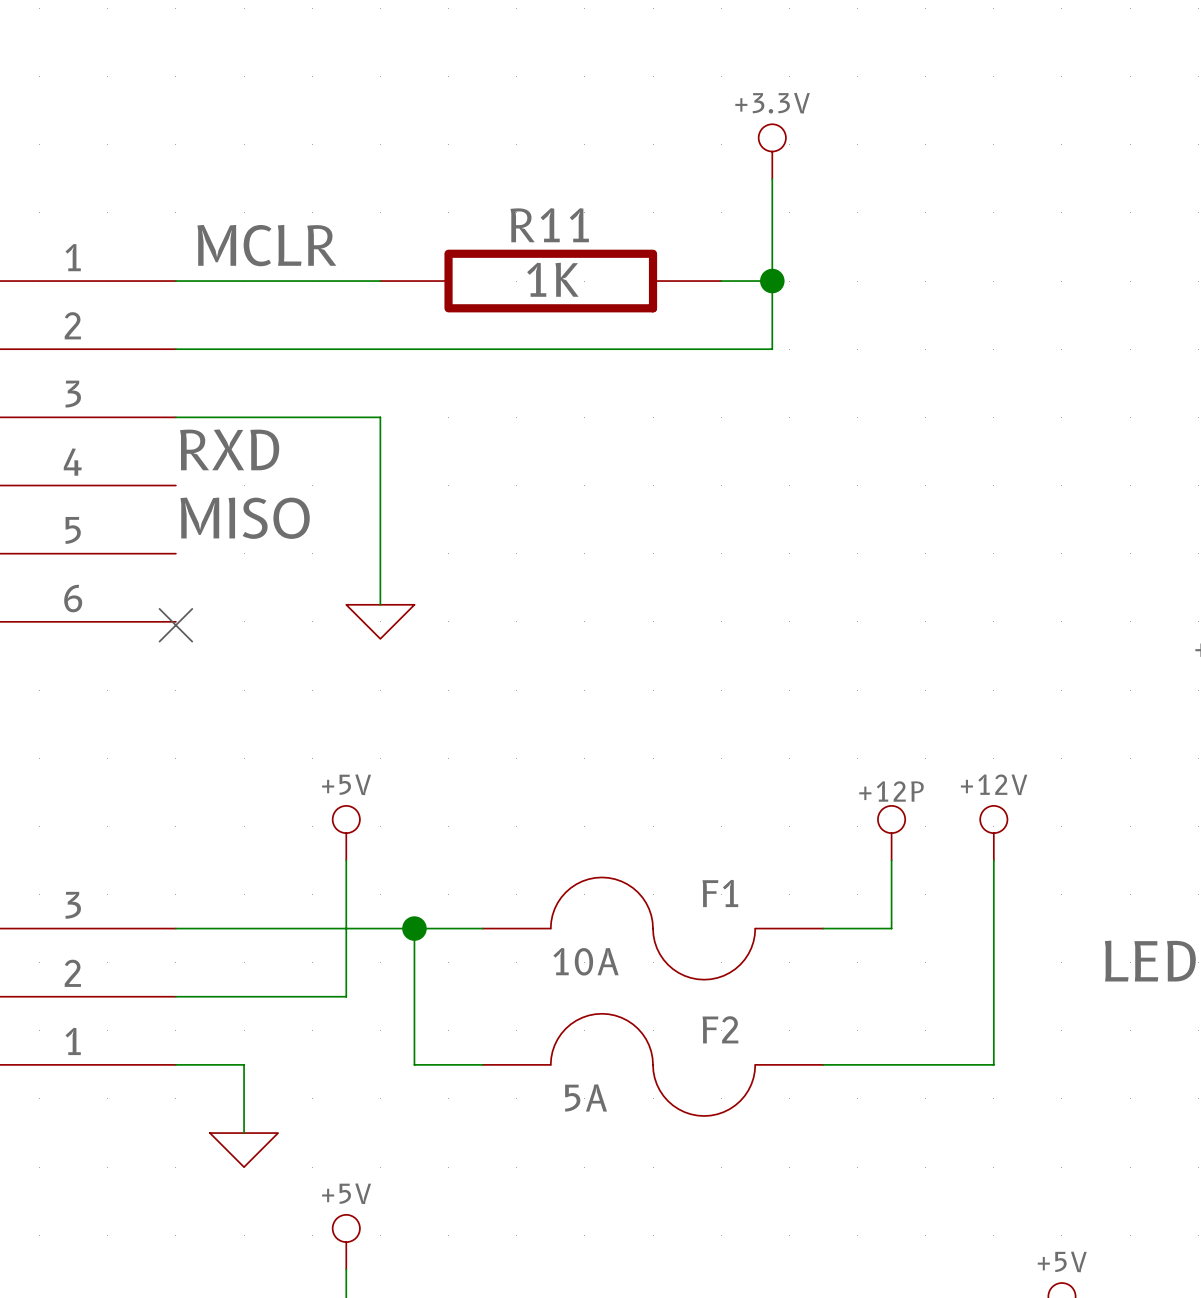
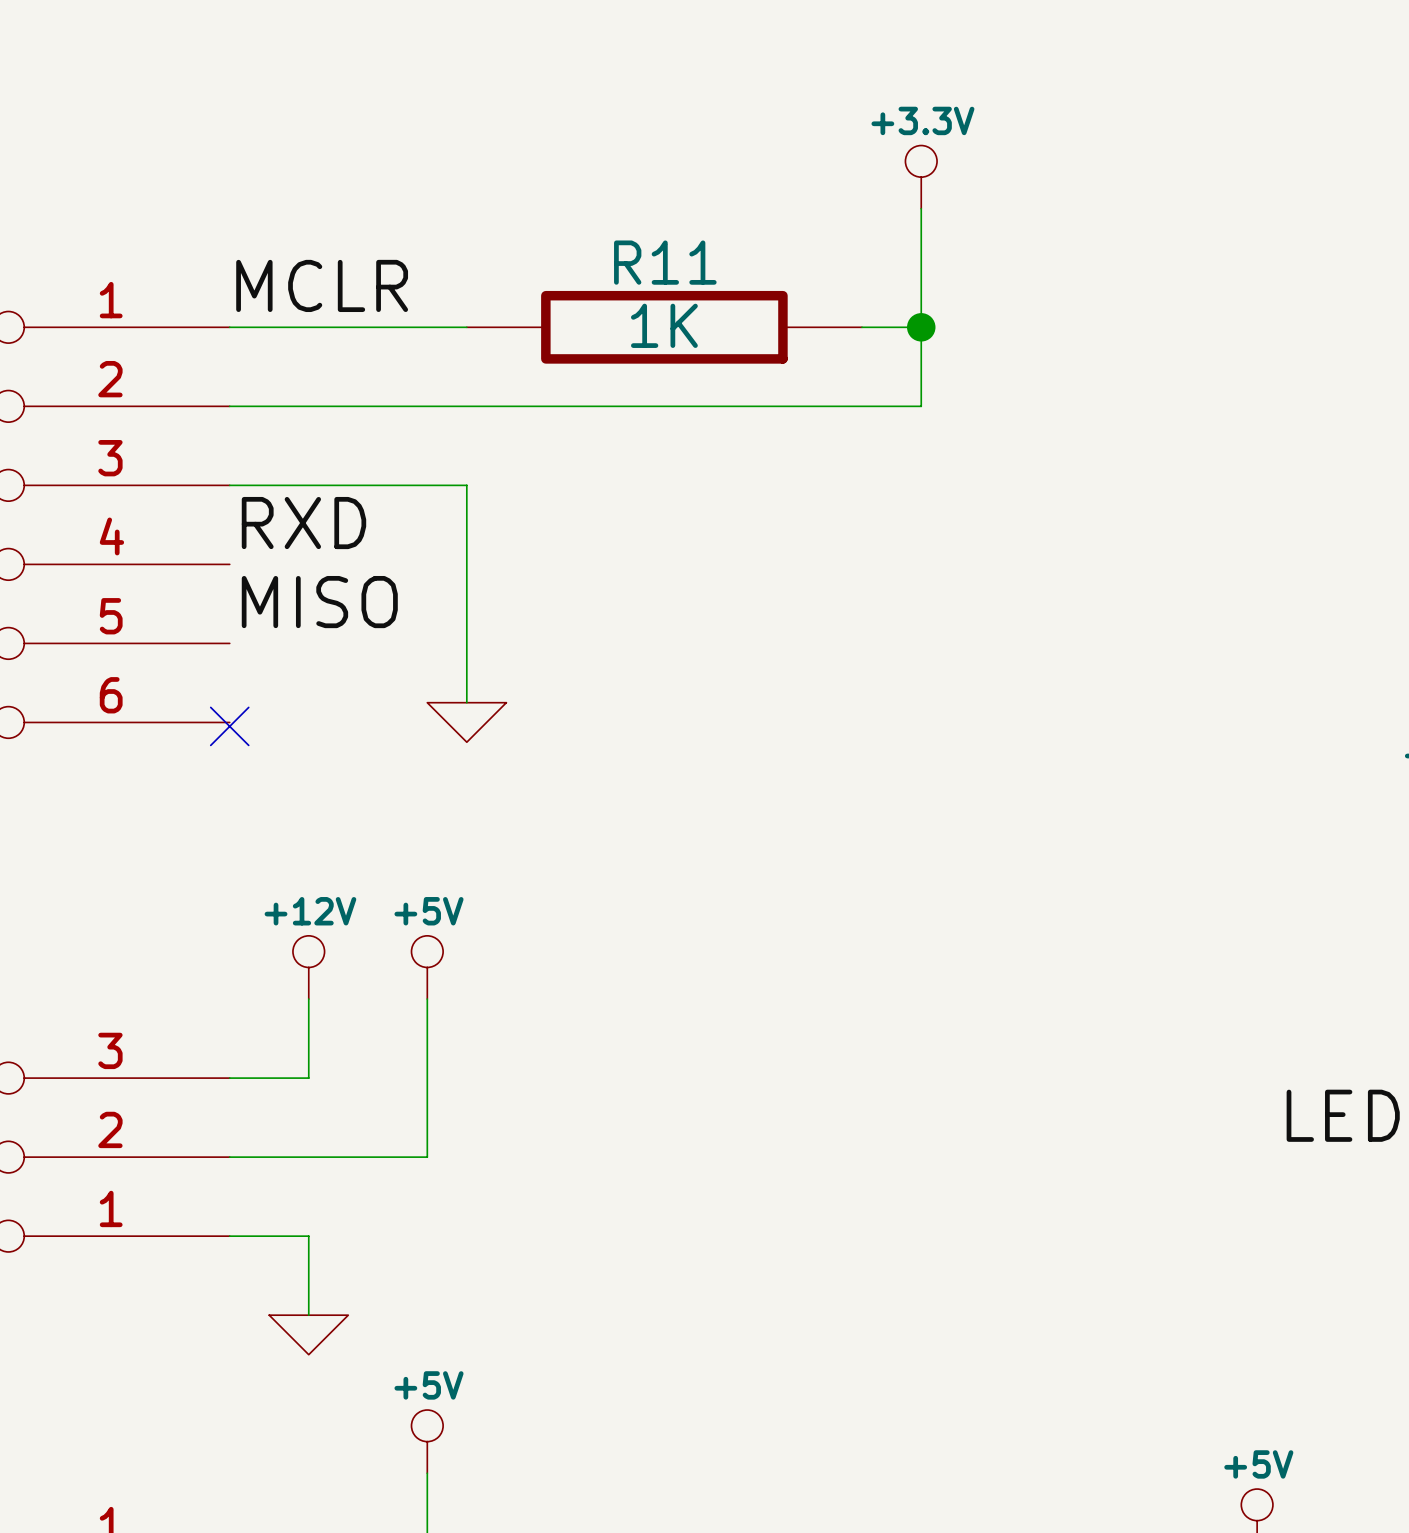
power symbol: none -> +12V (308, 967)
power symbol: +12P (891, 833) -> none
power symbol: +12V (993, 833) -> none
wire: (891, 860) (891, 928) (823, 928) -> none
wire: (993, 860) (993, 1064) (823, 1064) -> none
wire: (244, 928) (482, 928) -> (308, 1078) (308, 999)
wire: (414, 928) (414, 1064) (482, 1064) -> none
junction: (414, 928) -> none
F1: 10A (653, 928) -> none
F2: 5A (653, 1064) -> none

